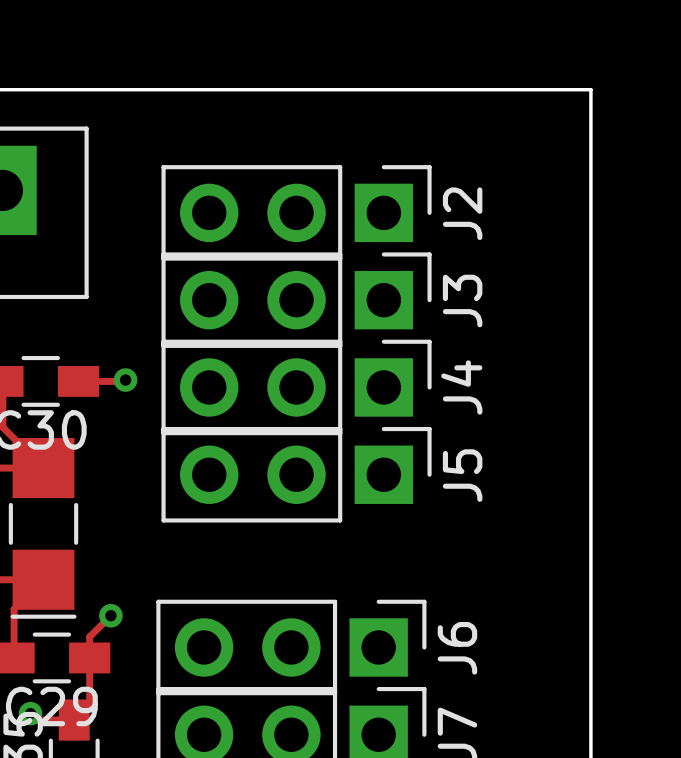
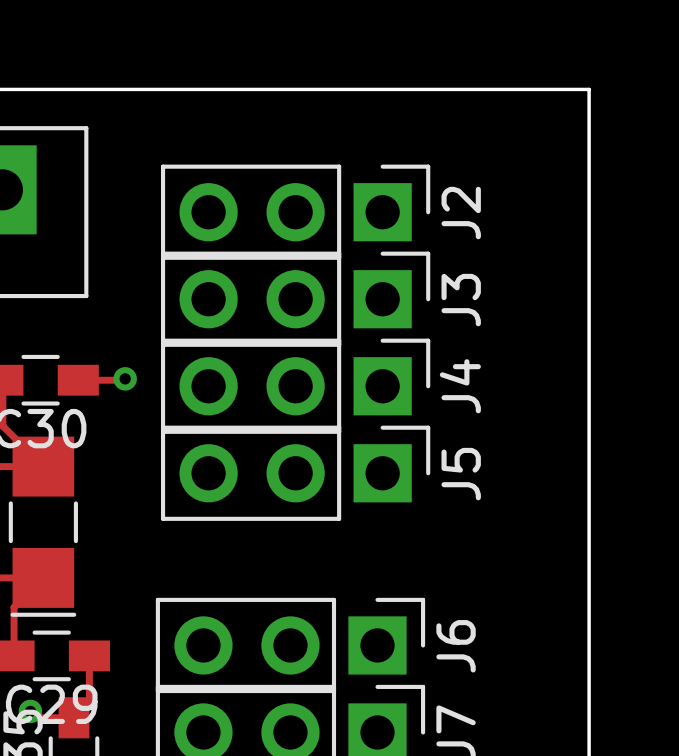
track: (110, 615) (89, 636) (89, 657) -> none
via: (110, 615) -> none

